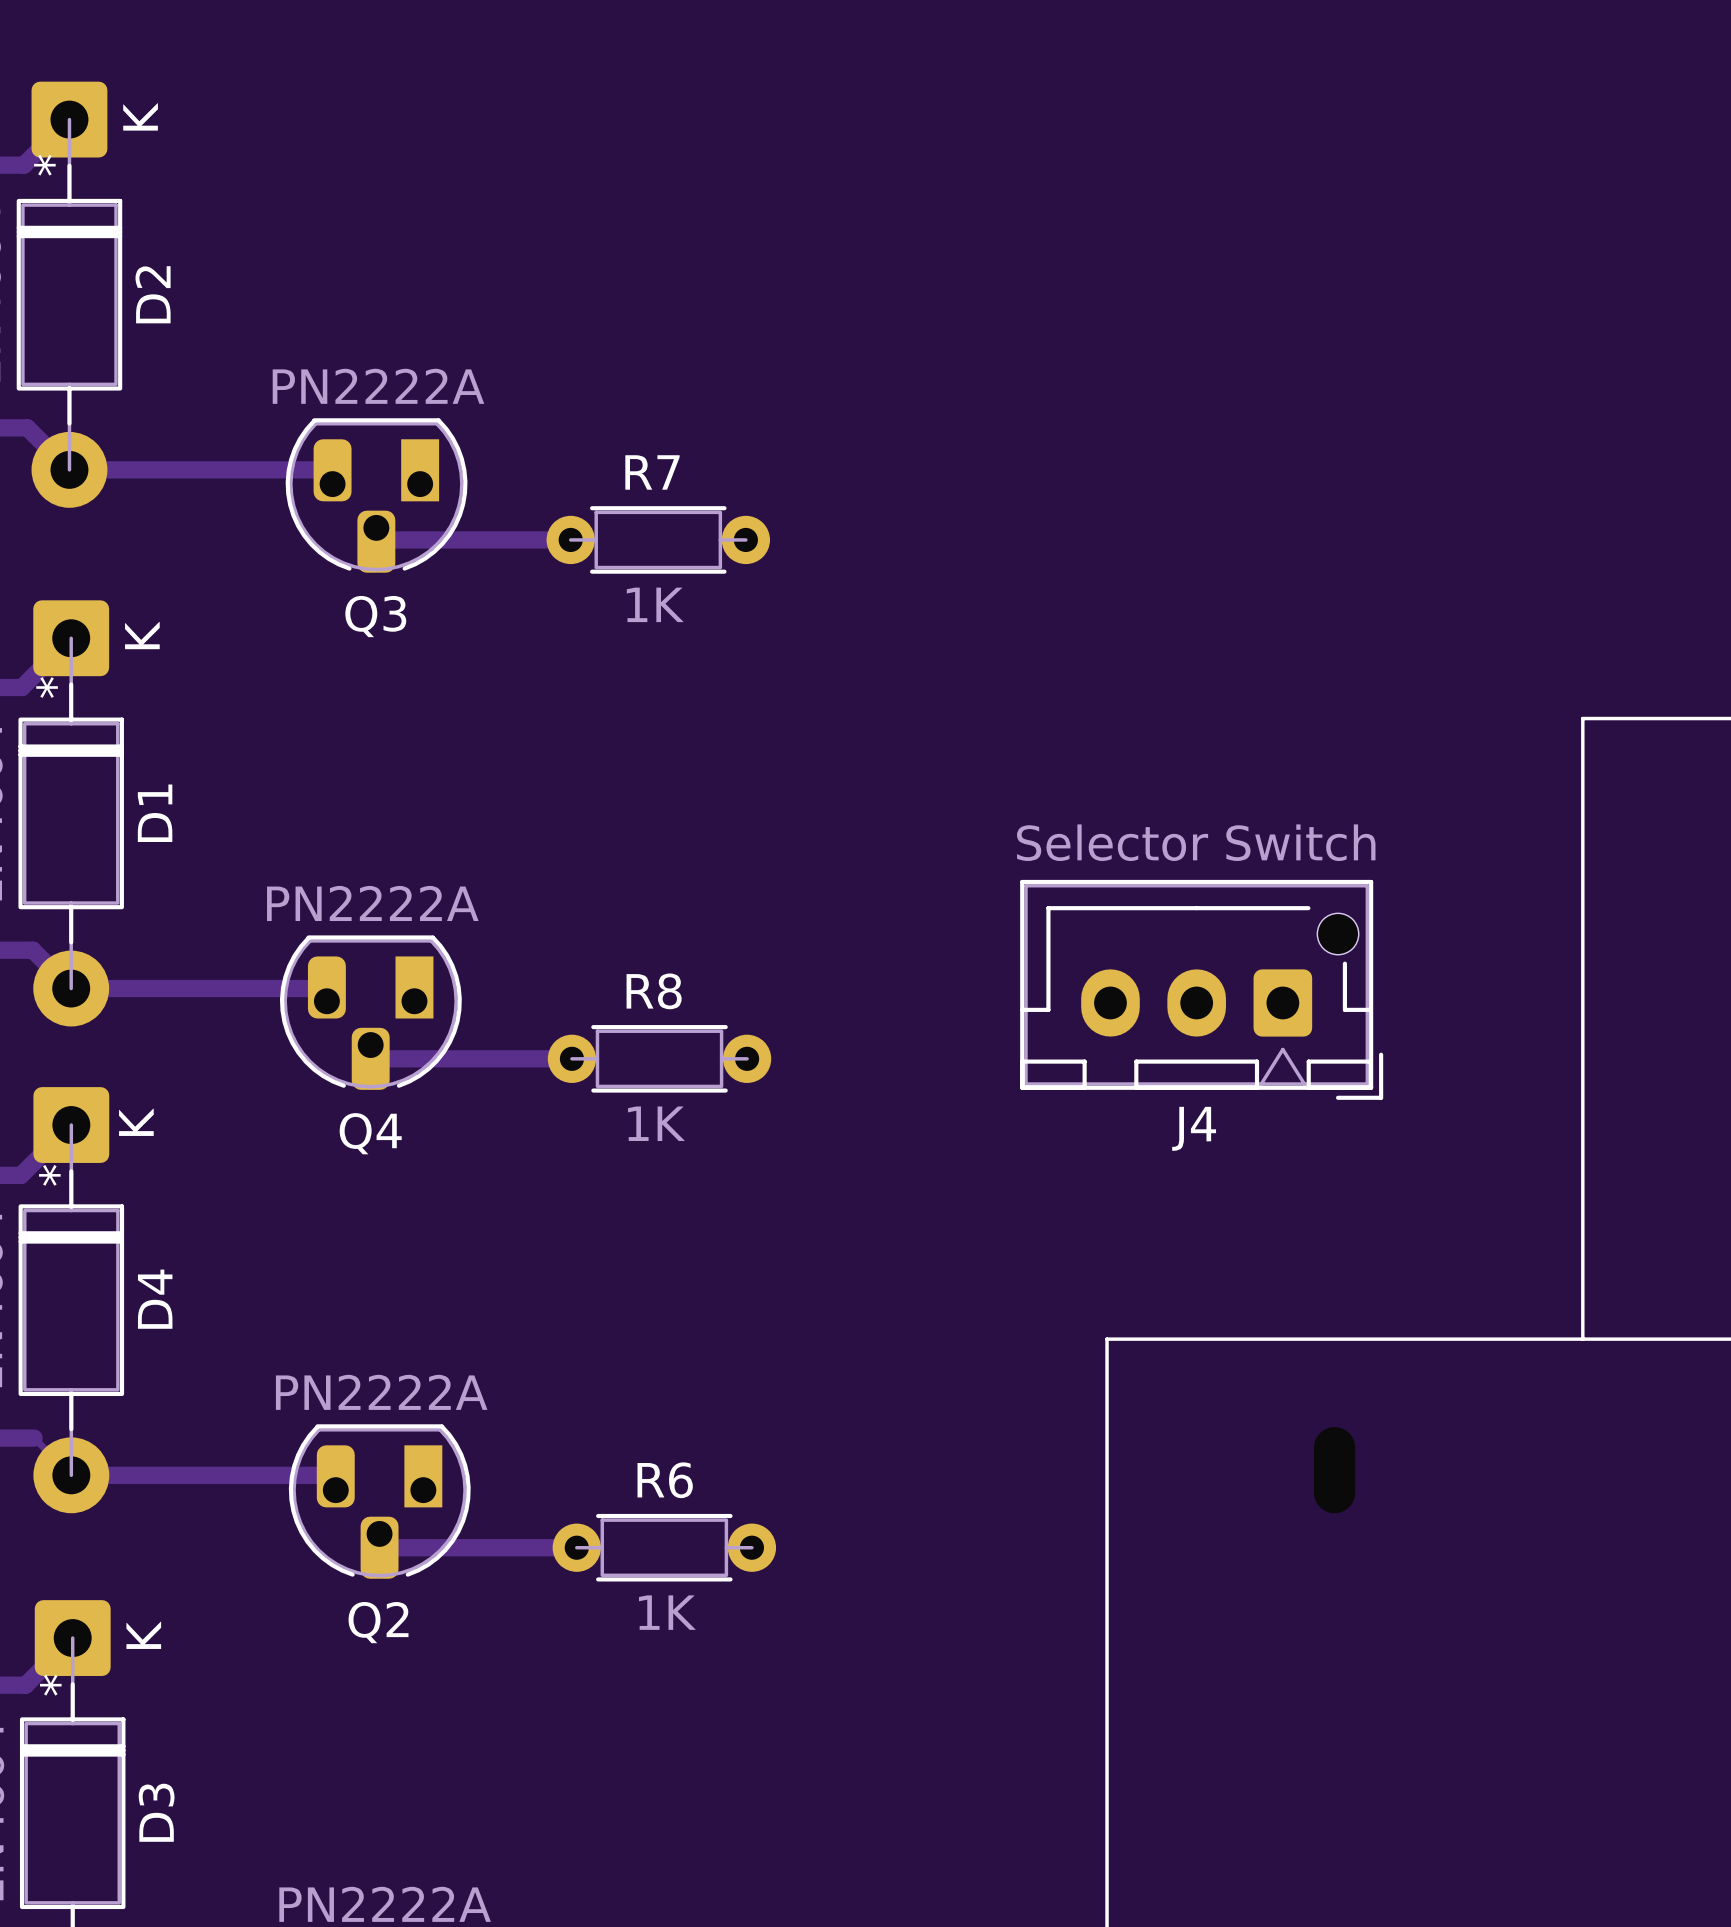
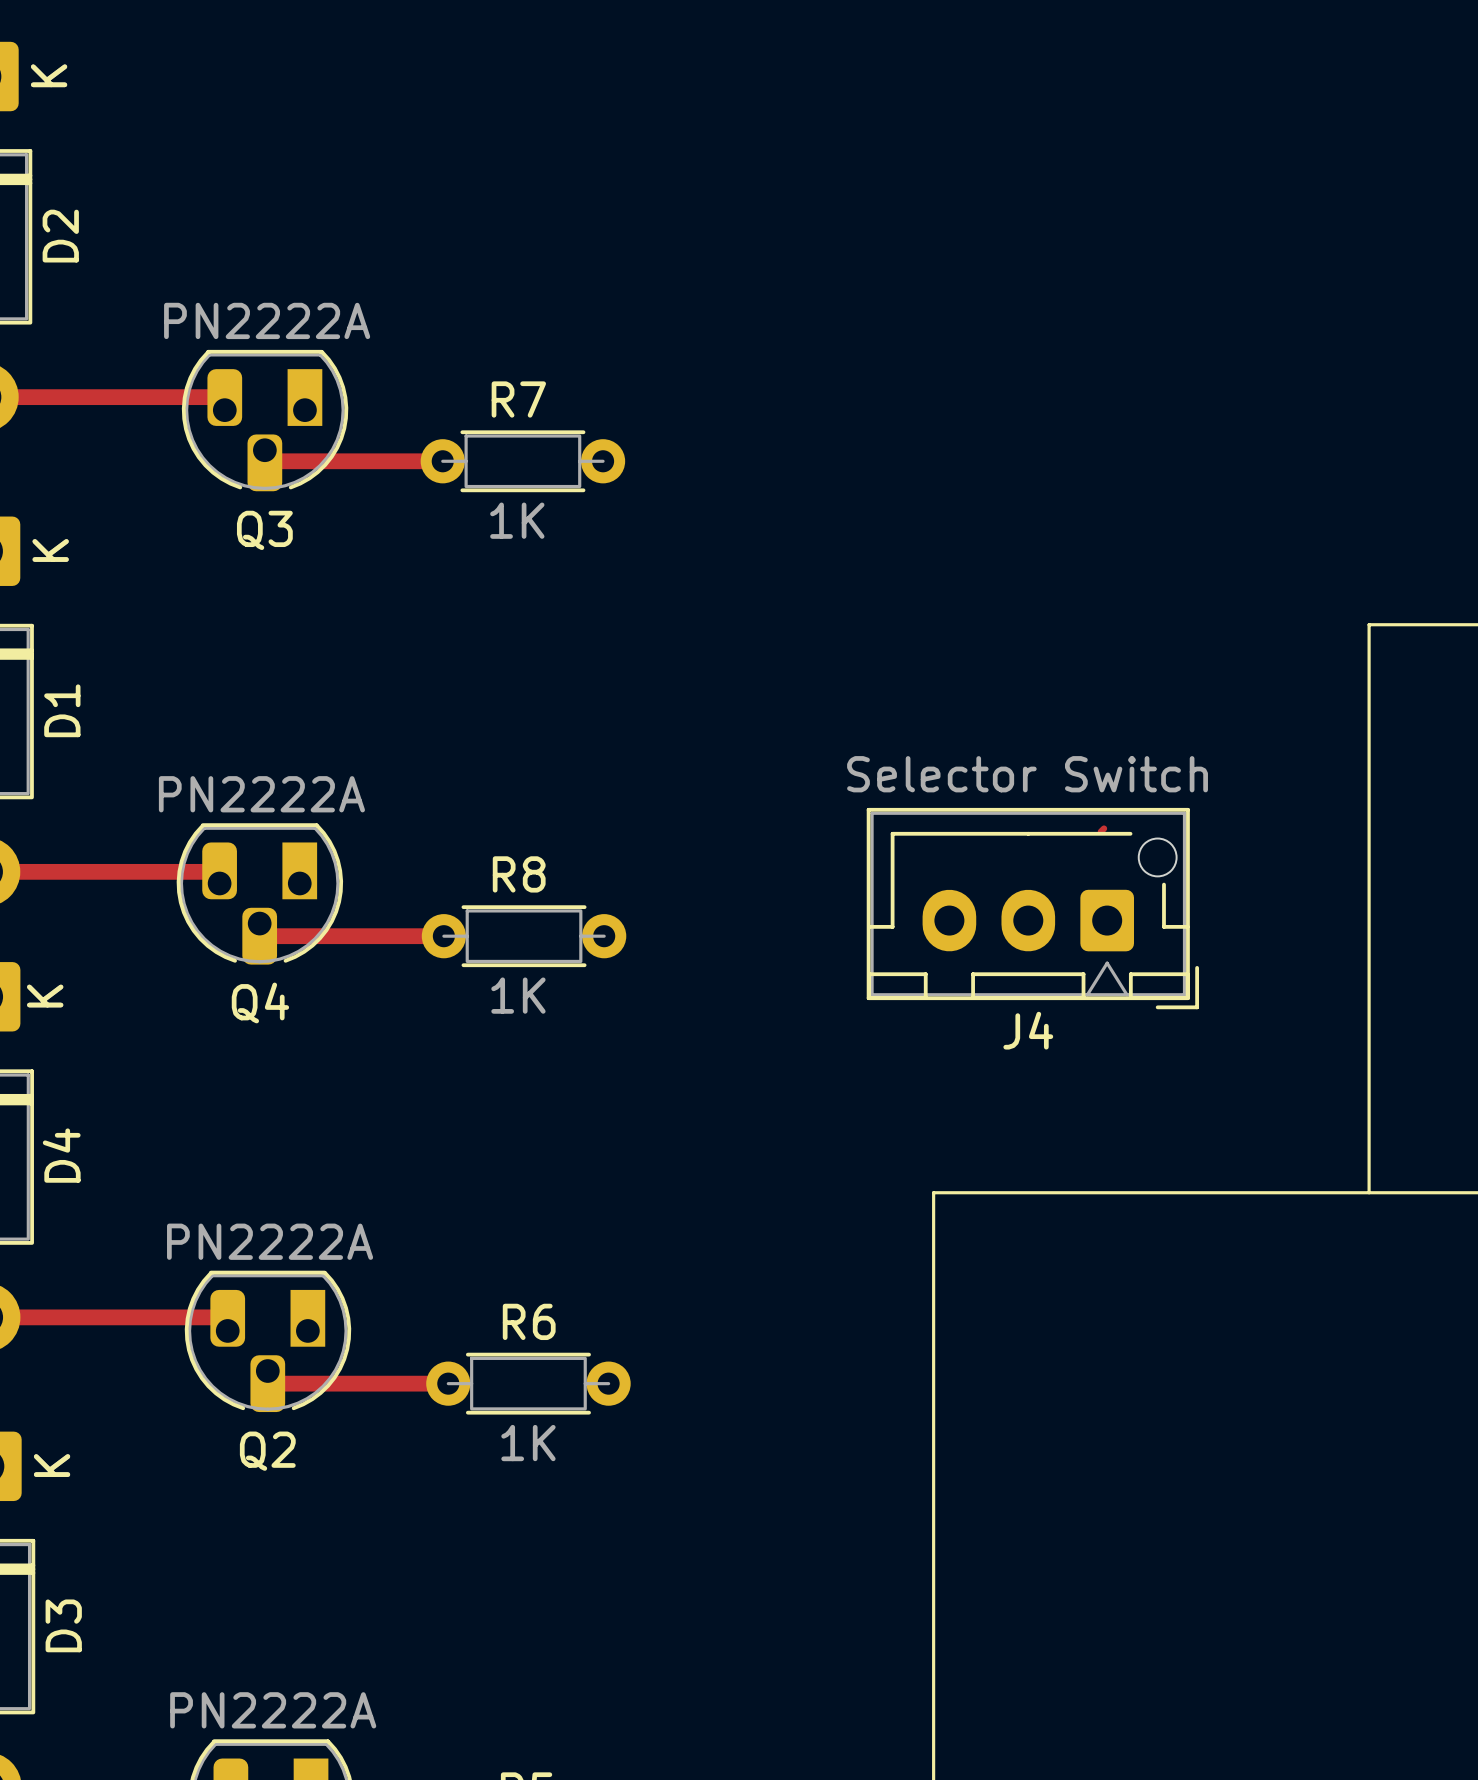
track: none -> (1104, 828) (1100, 831)
J4 position: (1201, 989) -> (1032, 908)

